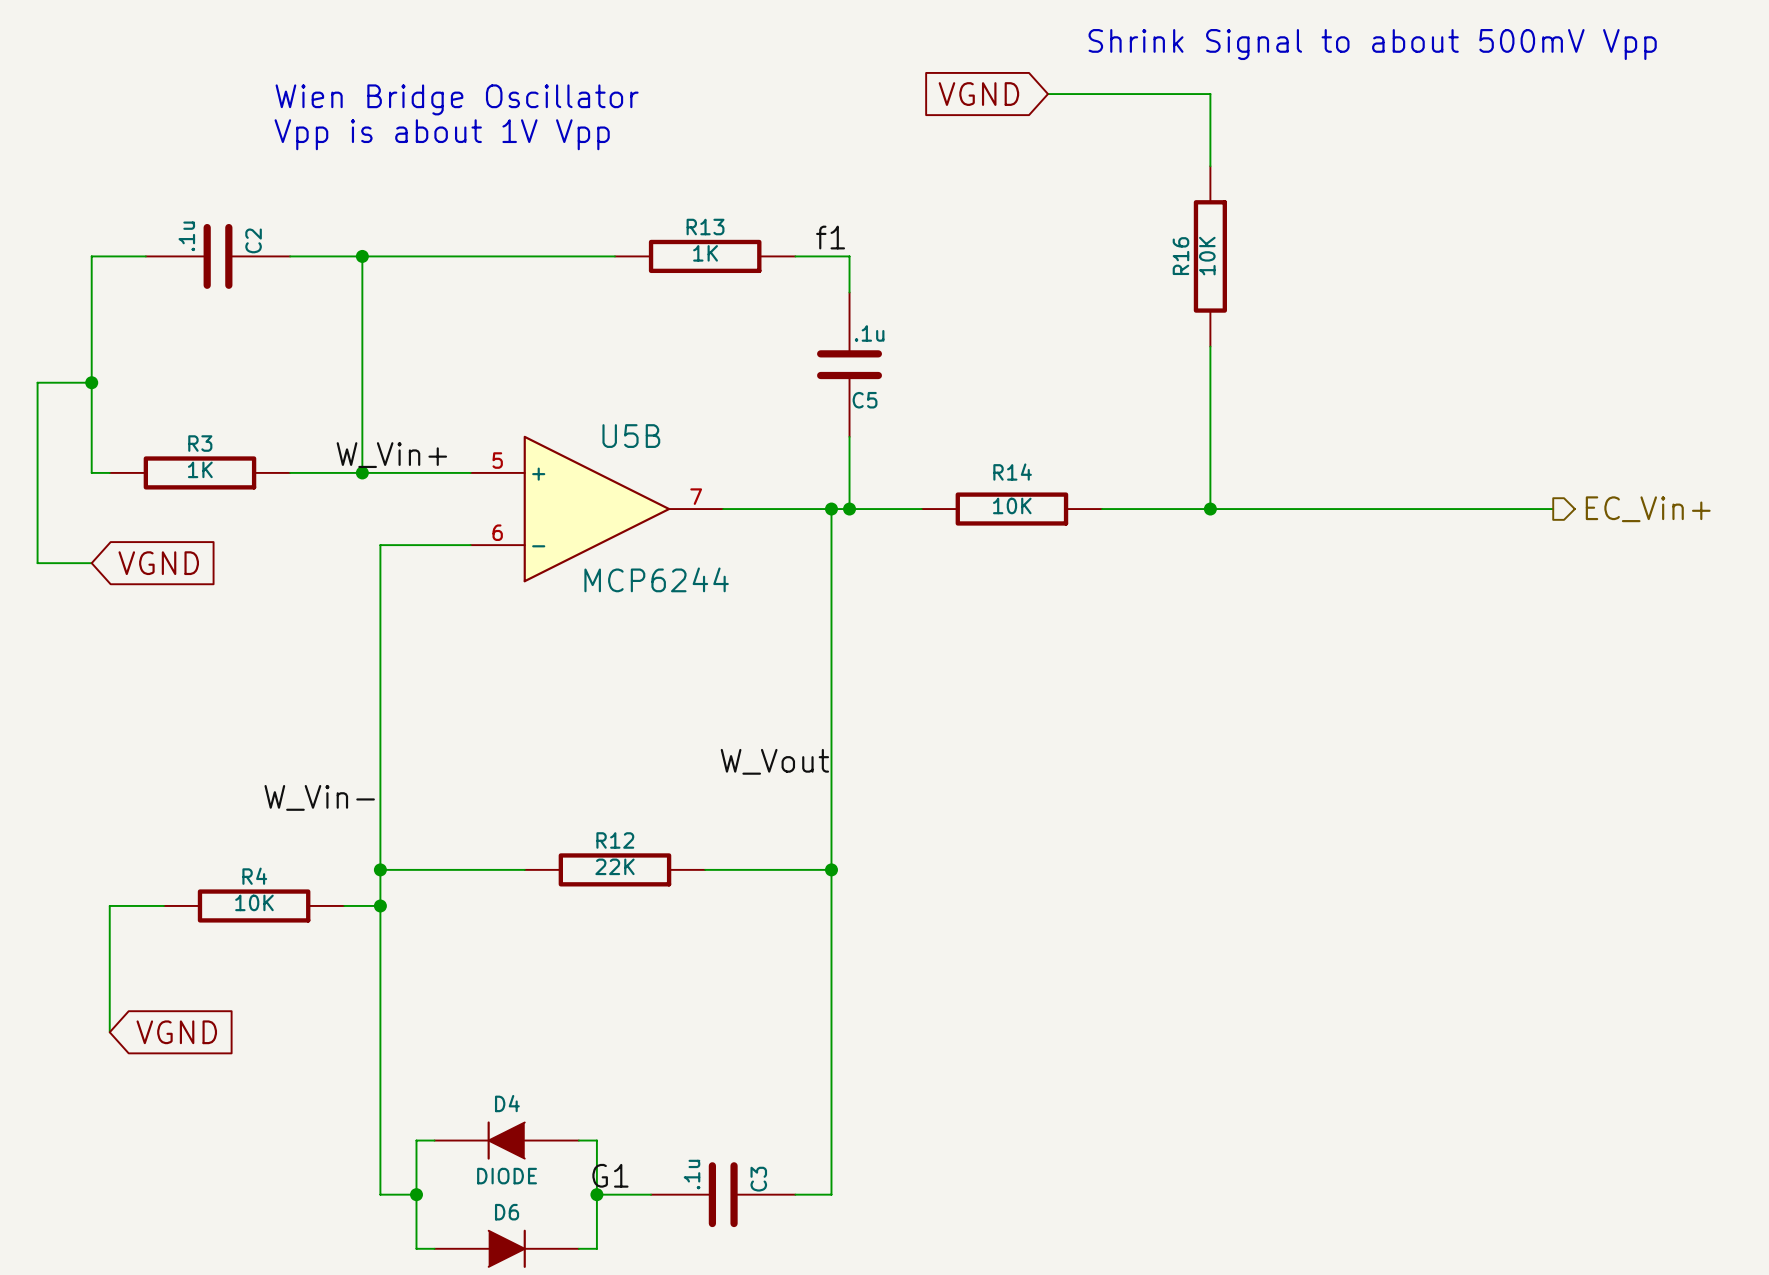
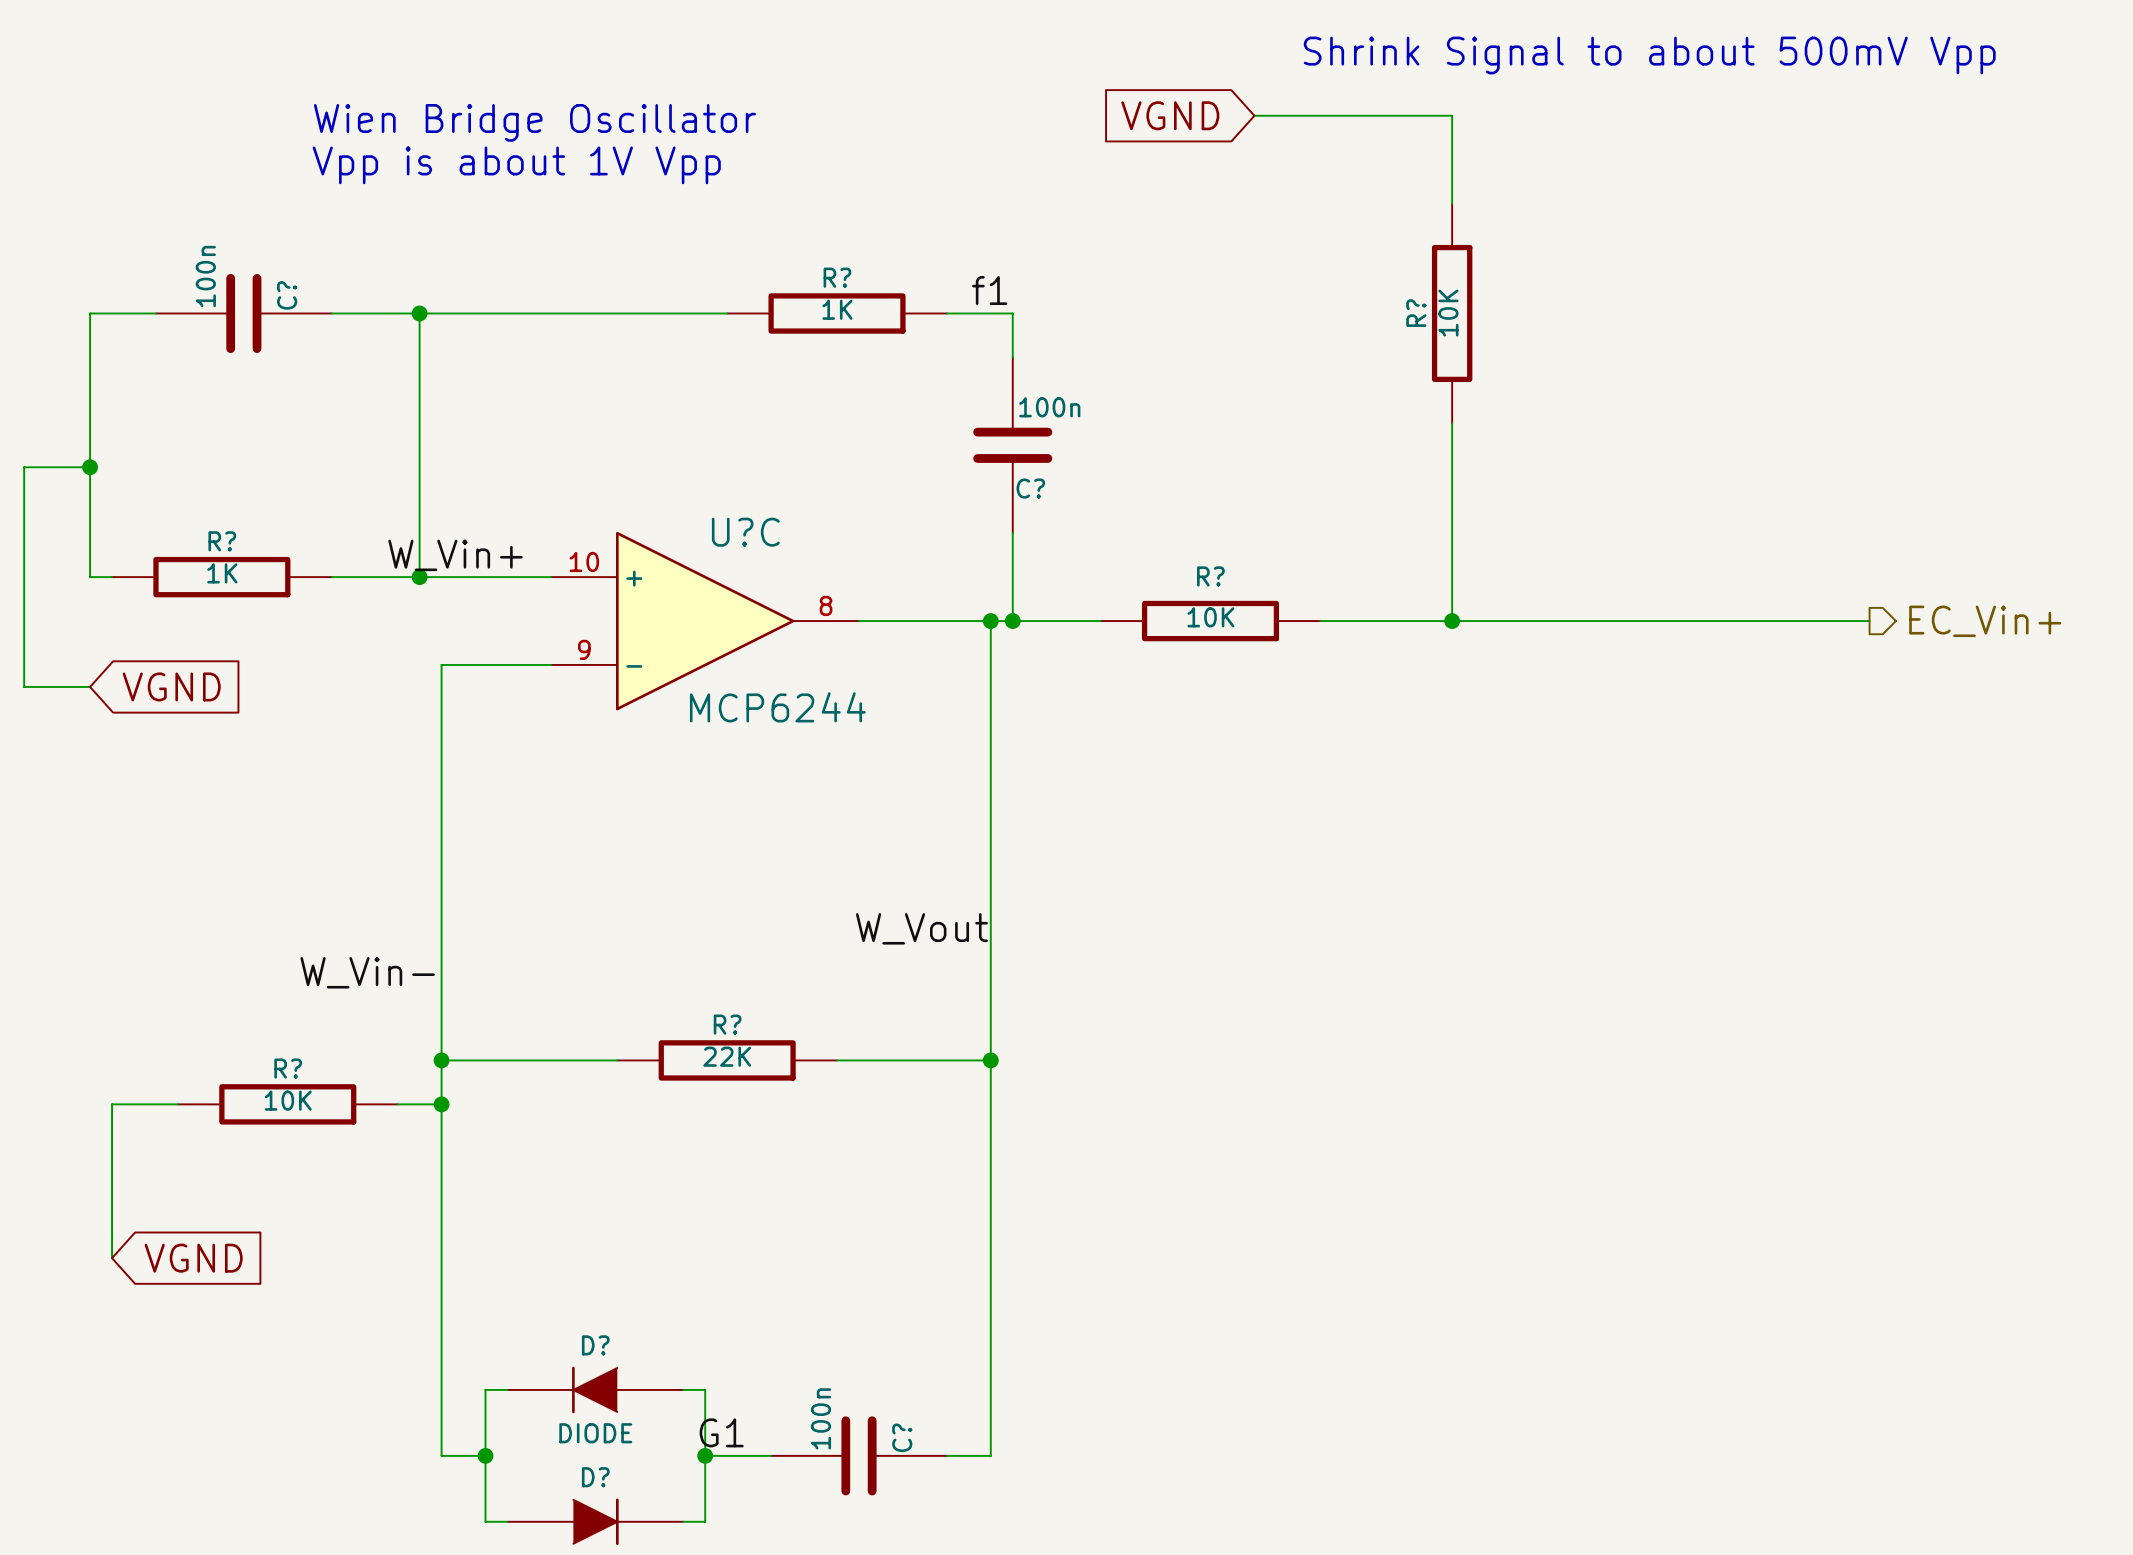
R13 name: R13 (705, 227) -> R? (837, 277)
C2 value: .1u (186, 236) -> 100n (205, 276)
C2 name: C2 (253, 240) -> C? (287, 295)
R16 name: R16 (1180, 256) -> R? (1416, 313)
C5 value: .1u (869, 333) -> 100n (1049, 407)
C5 name: C5 (865, 400) -> C? (1030, 488)
R3 name: R3 (200, 443) -> R? (222, 541)
R14 name: R14 (1012, 472) -> R? (1210, 576)
U5B: MCP6244 (596, 509) -> none
U?C: none -> MCP6244 (705, 621)
R12 name: R12 (615, 840) -> R? (727, 1024)
R4 name: R4 (254, 876) -> R? (288, 1068)
D4 name: D4 (507, 1103) -> D? (595, 1345)
C3 value: .1u (692, 1174) -> 100n (820, 1418)
C3 name: C3 (758, 1179) -> C? (902, 1437)
D6 name: D6 (507, 1212) -> D? (595, 1477)

